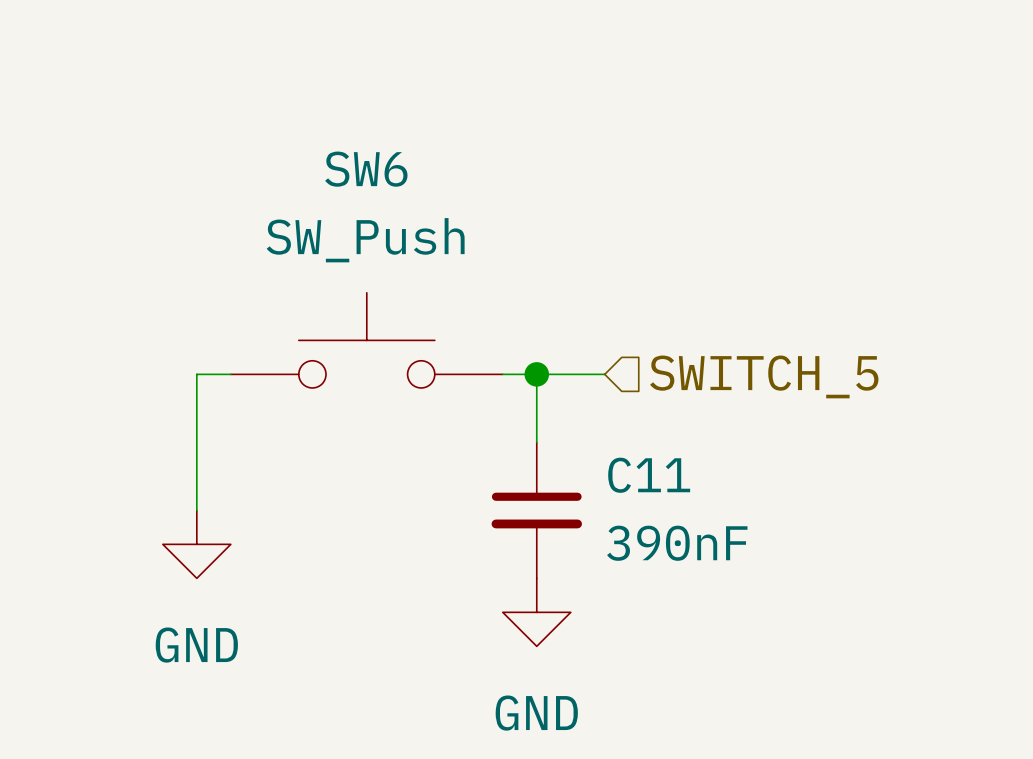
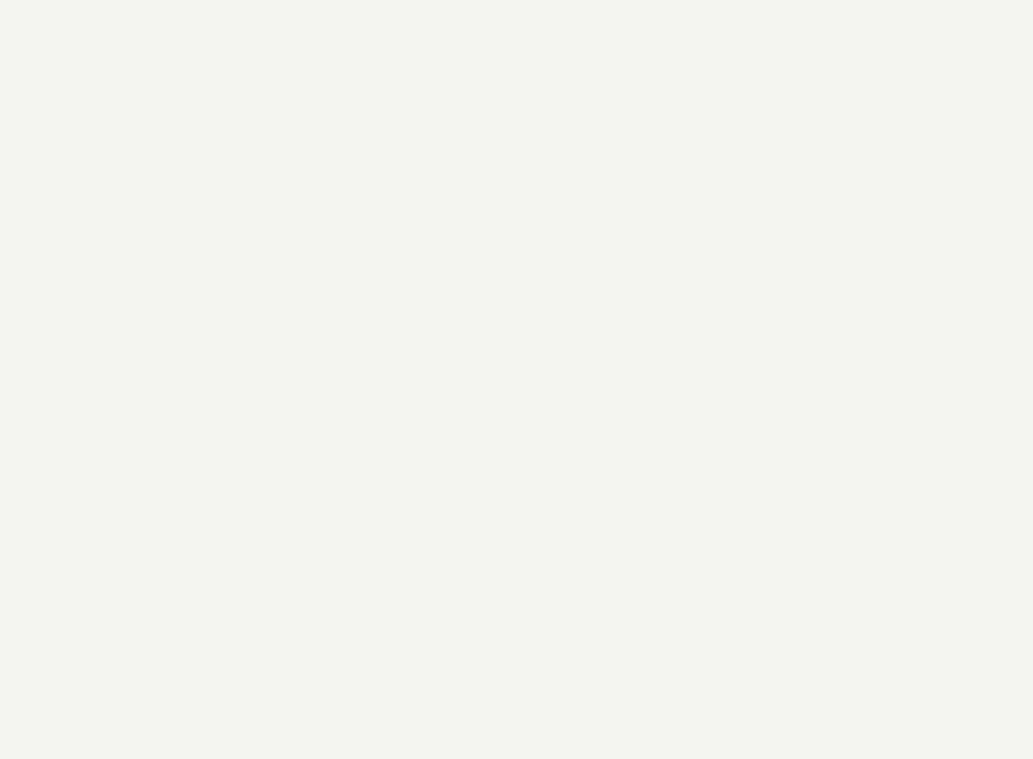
SW6: SW_Push (366, 340) -> none
wire: (230, 374) (196, 374) (196, 510) -> none
wire: (502, 374) (604, 374) -> none
wire: (536, 374) (536, 442) -> none
junction: (536, 374) -> none
hierarchical label: SWITCH_5 (764, 376) -> none
C11: 390nF (536, 510) -> none
power symbol: GND (196, 544) -> none
power symbol: GND (536, 612) -> none

